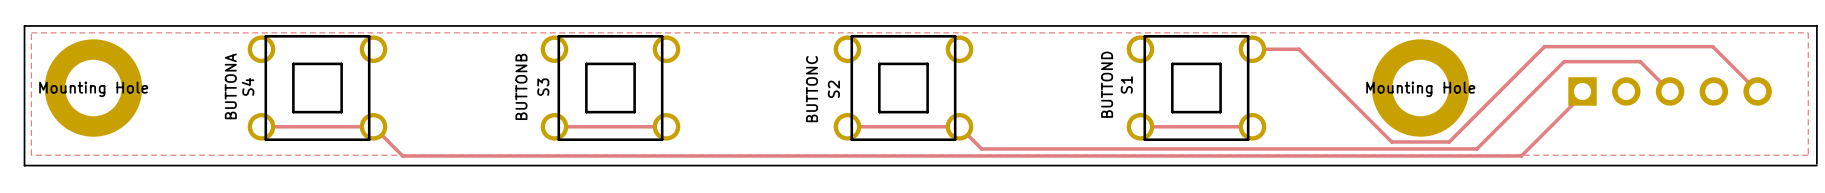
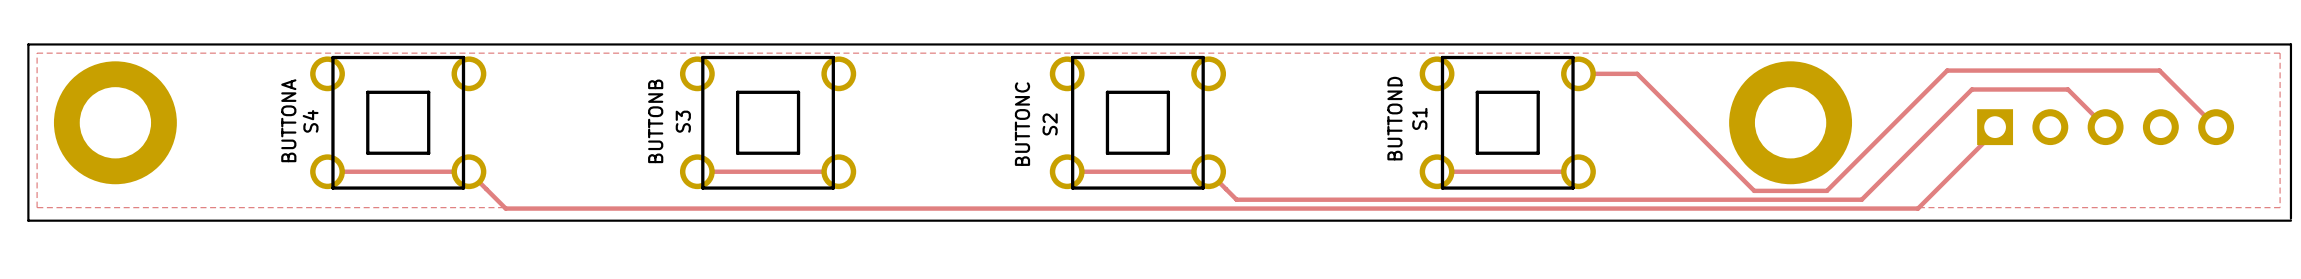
part value: Mounting Hole (93, 89) -> none
part value: Mounting Hole (1420, 89) -> none

